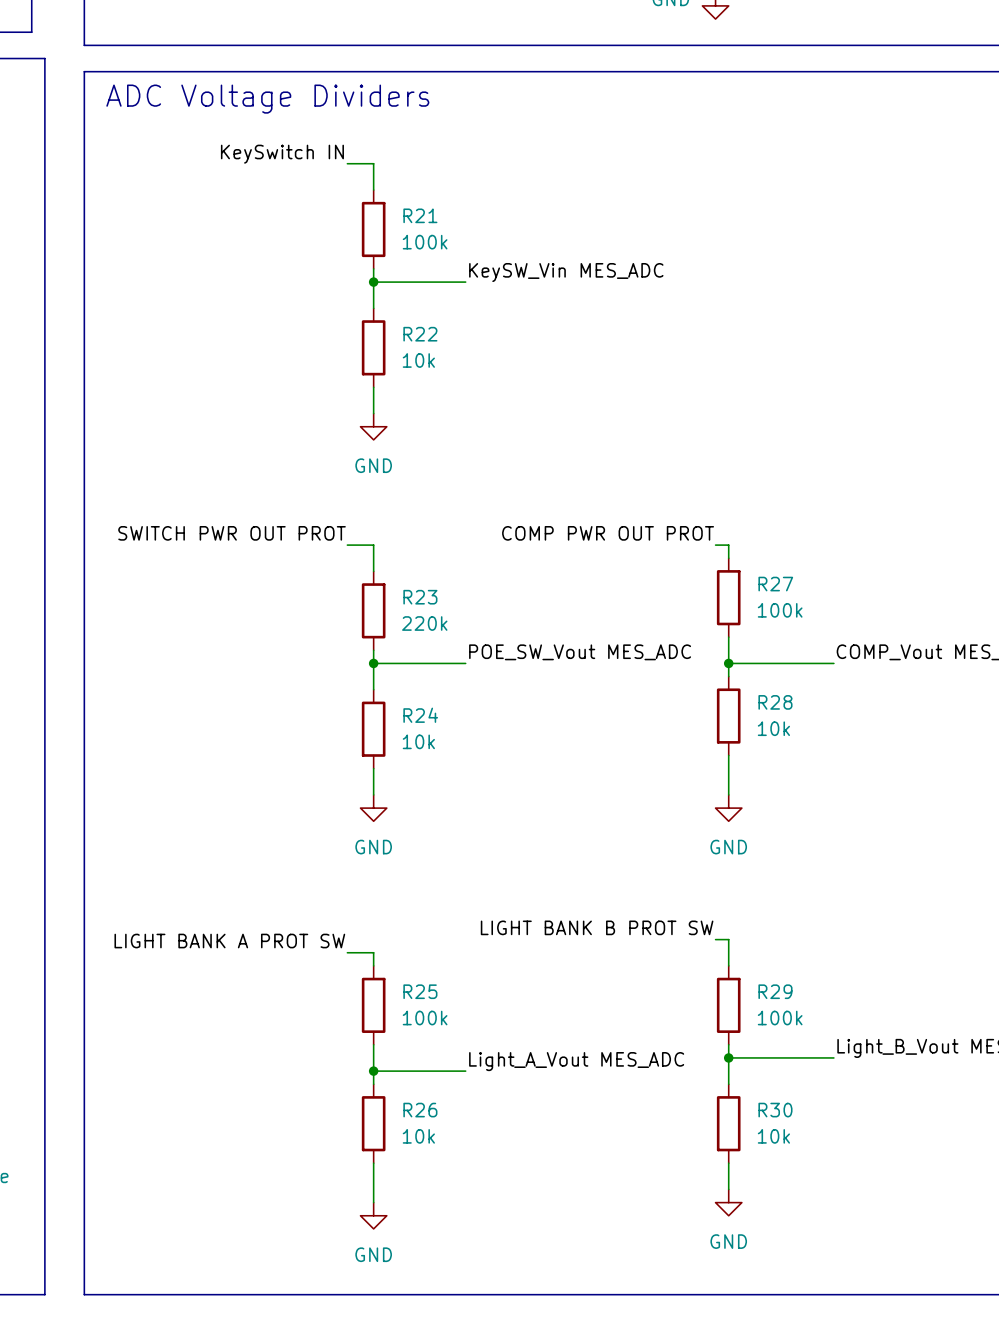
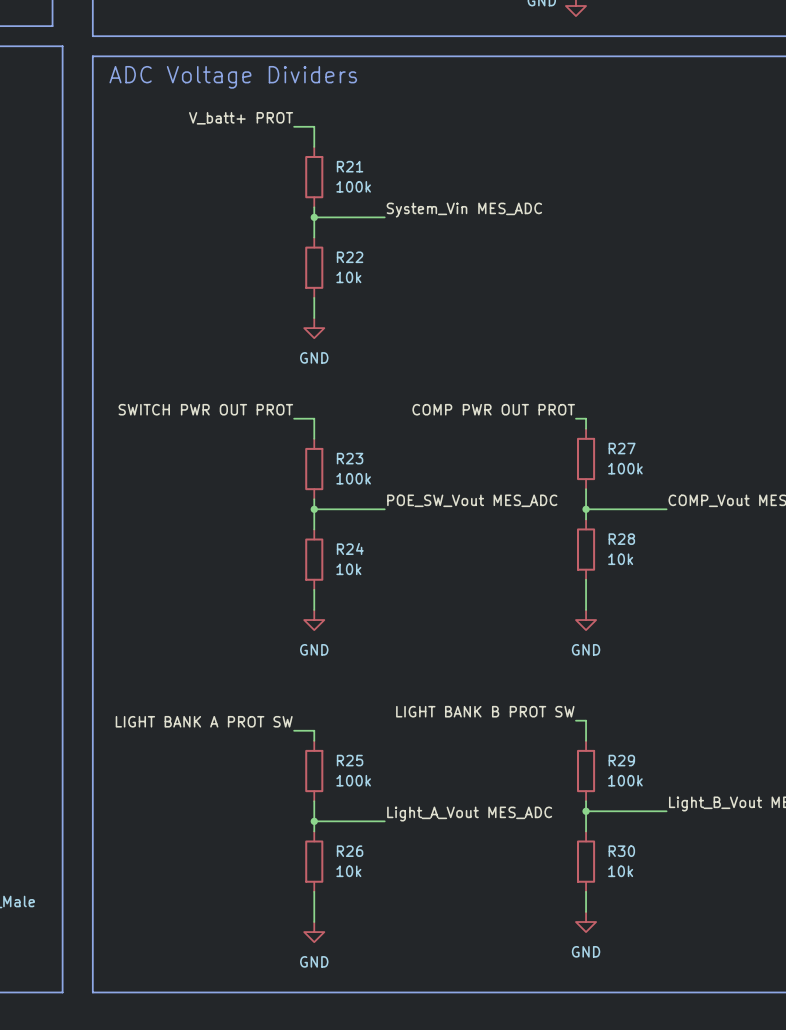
label: KeySwitch IN (282, 154) -> V_batt+ PROT (241, 118)
label: KeySW_Vin MES_ADC (566, 272) -> System_Vin MES_ADC (464, 210)
R23 value: 220k (424, 623) -> 100k (353, 478)

